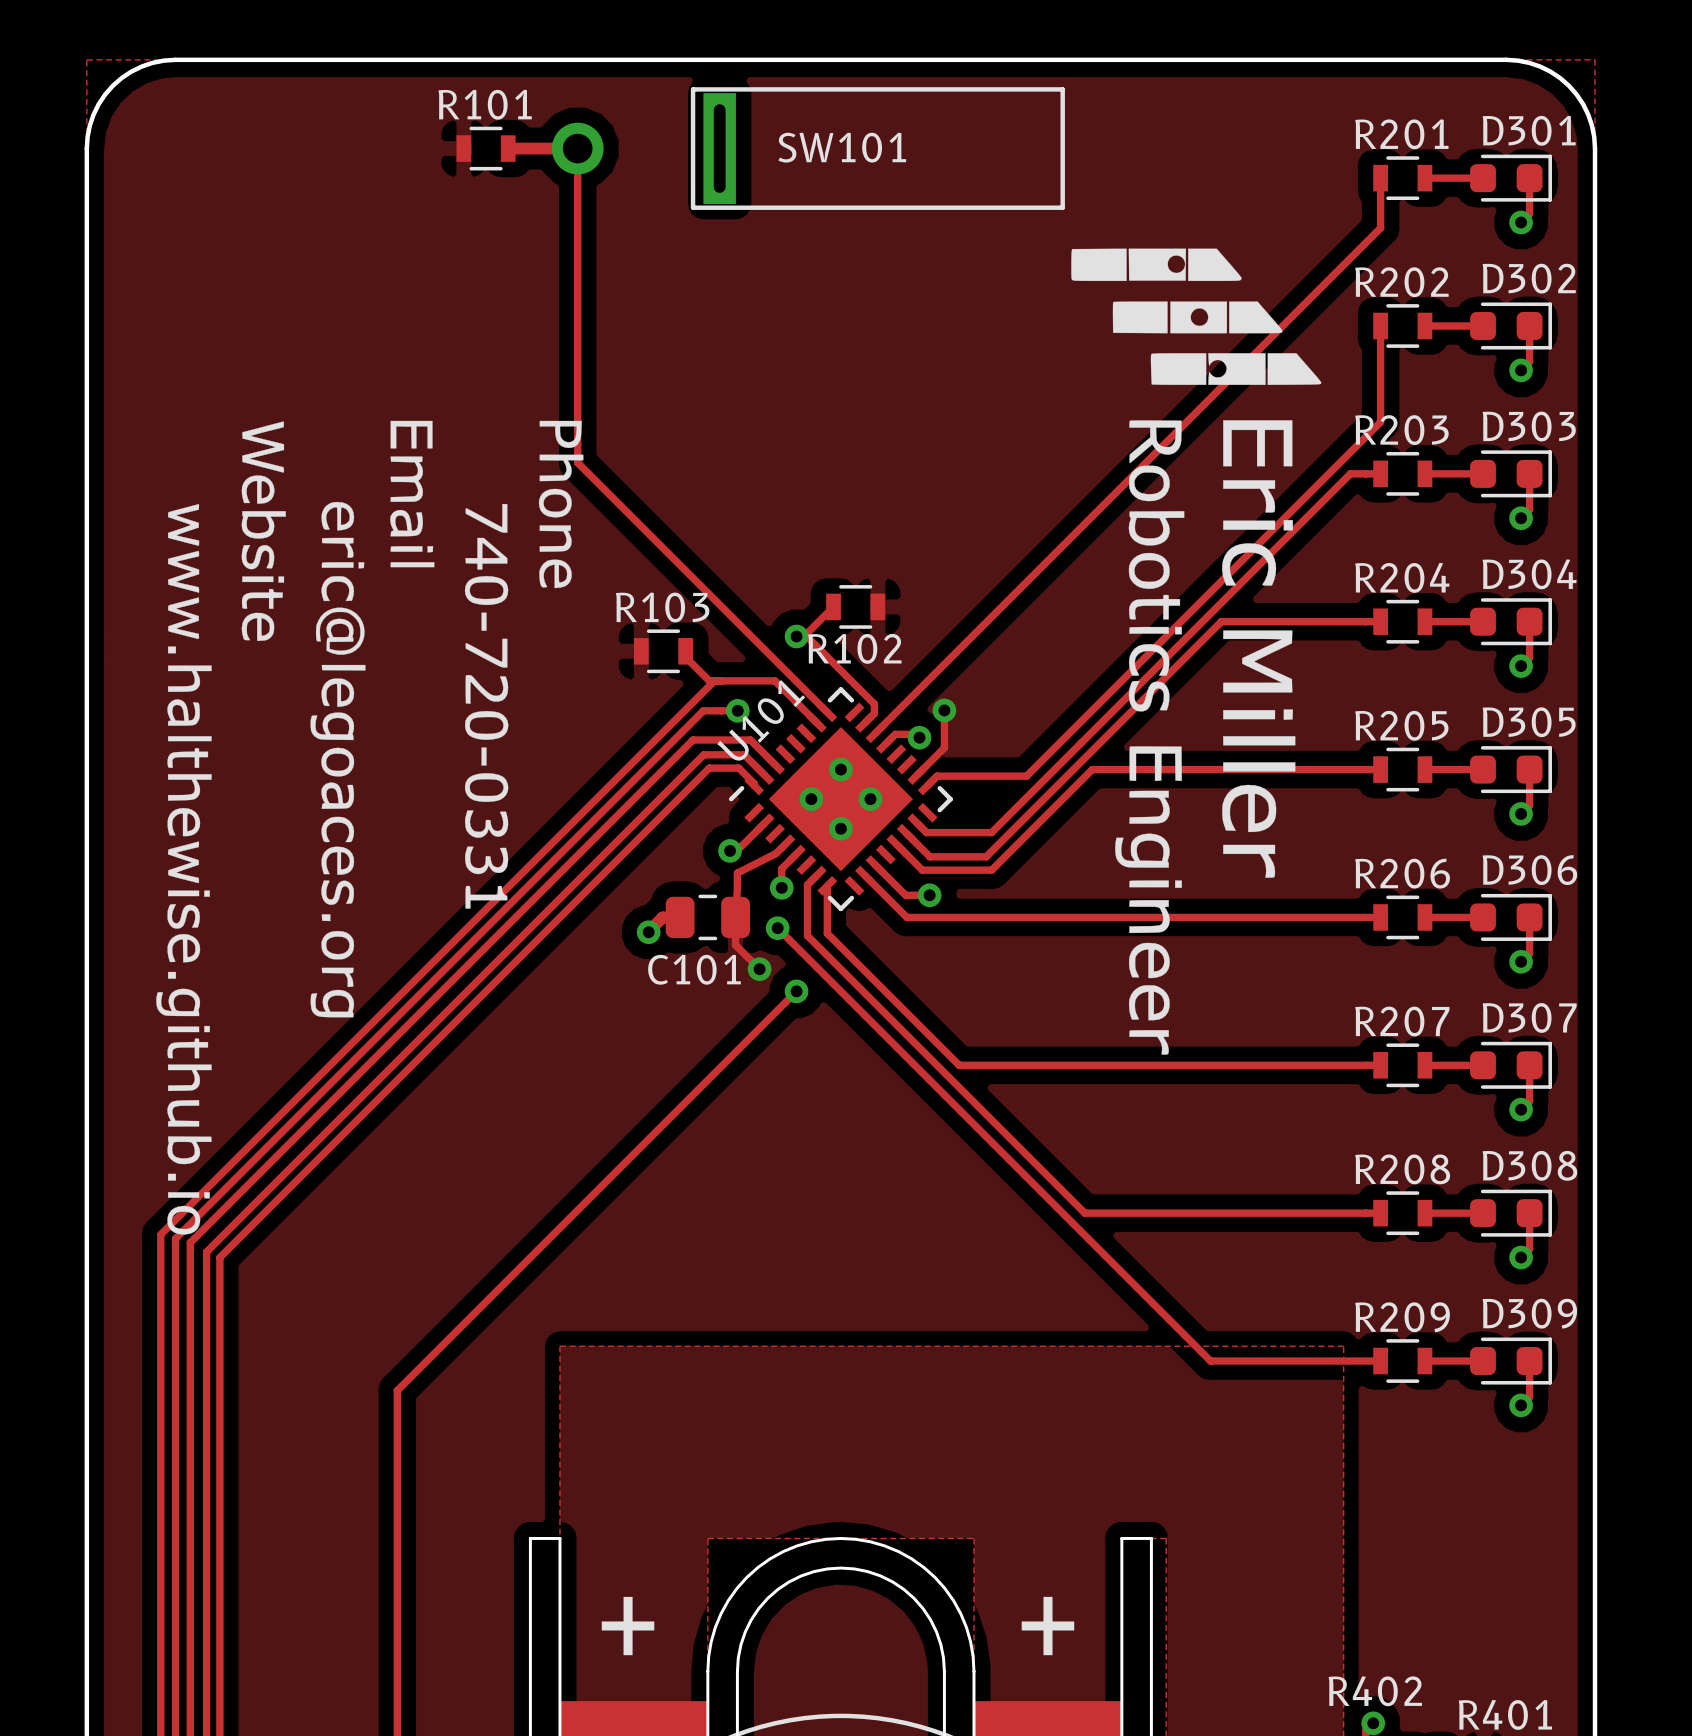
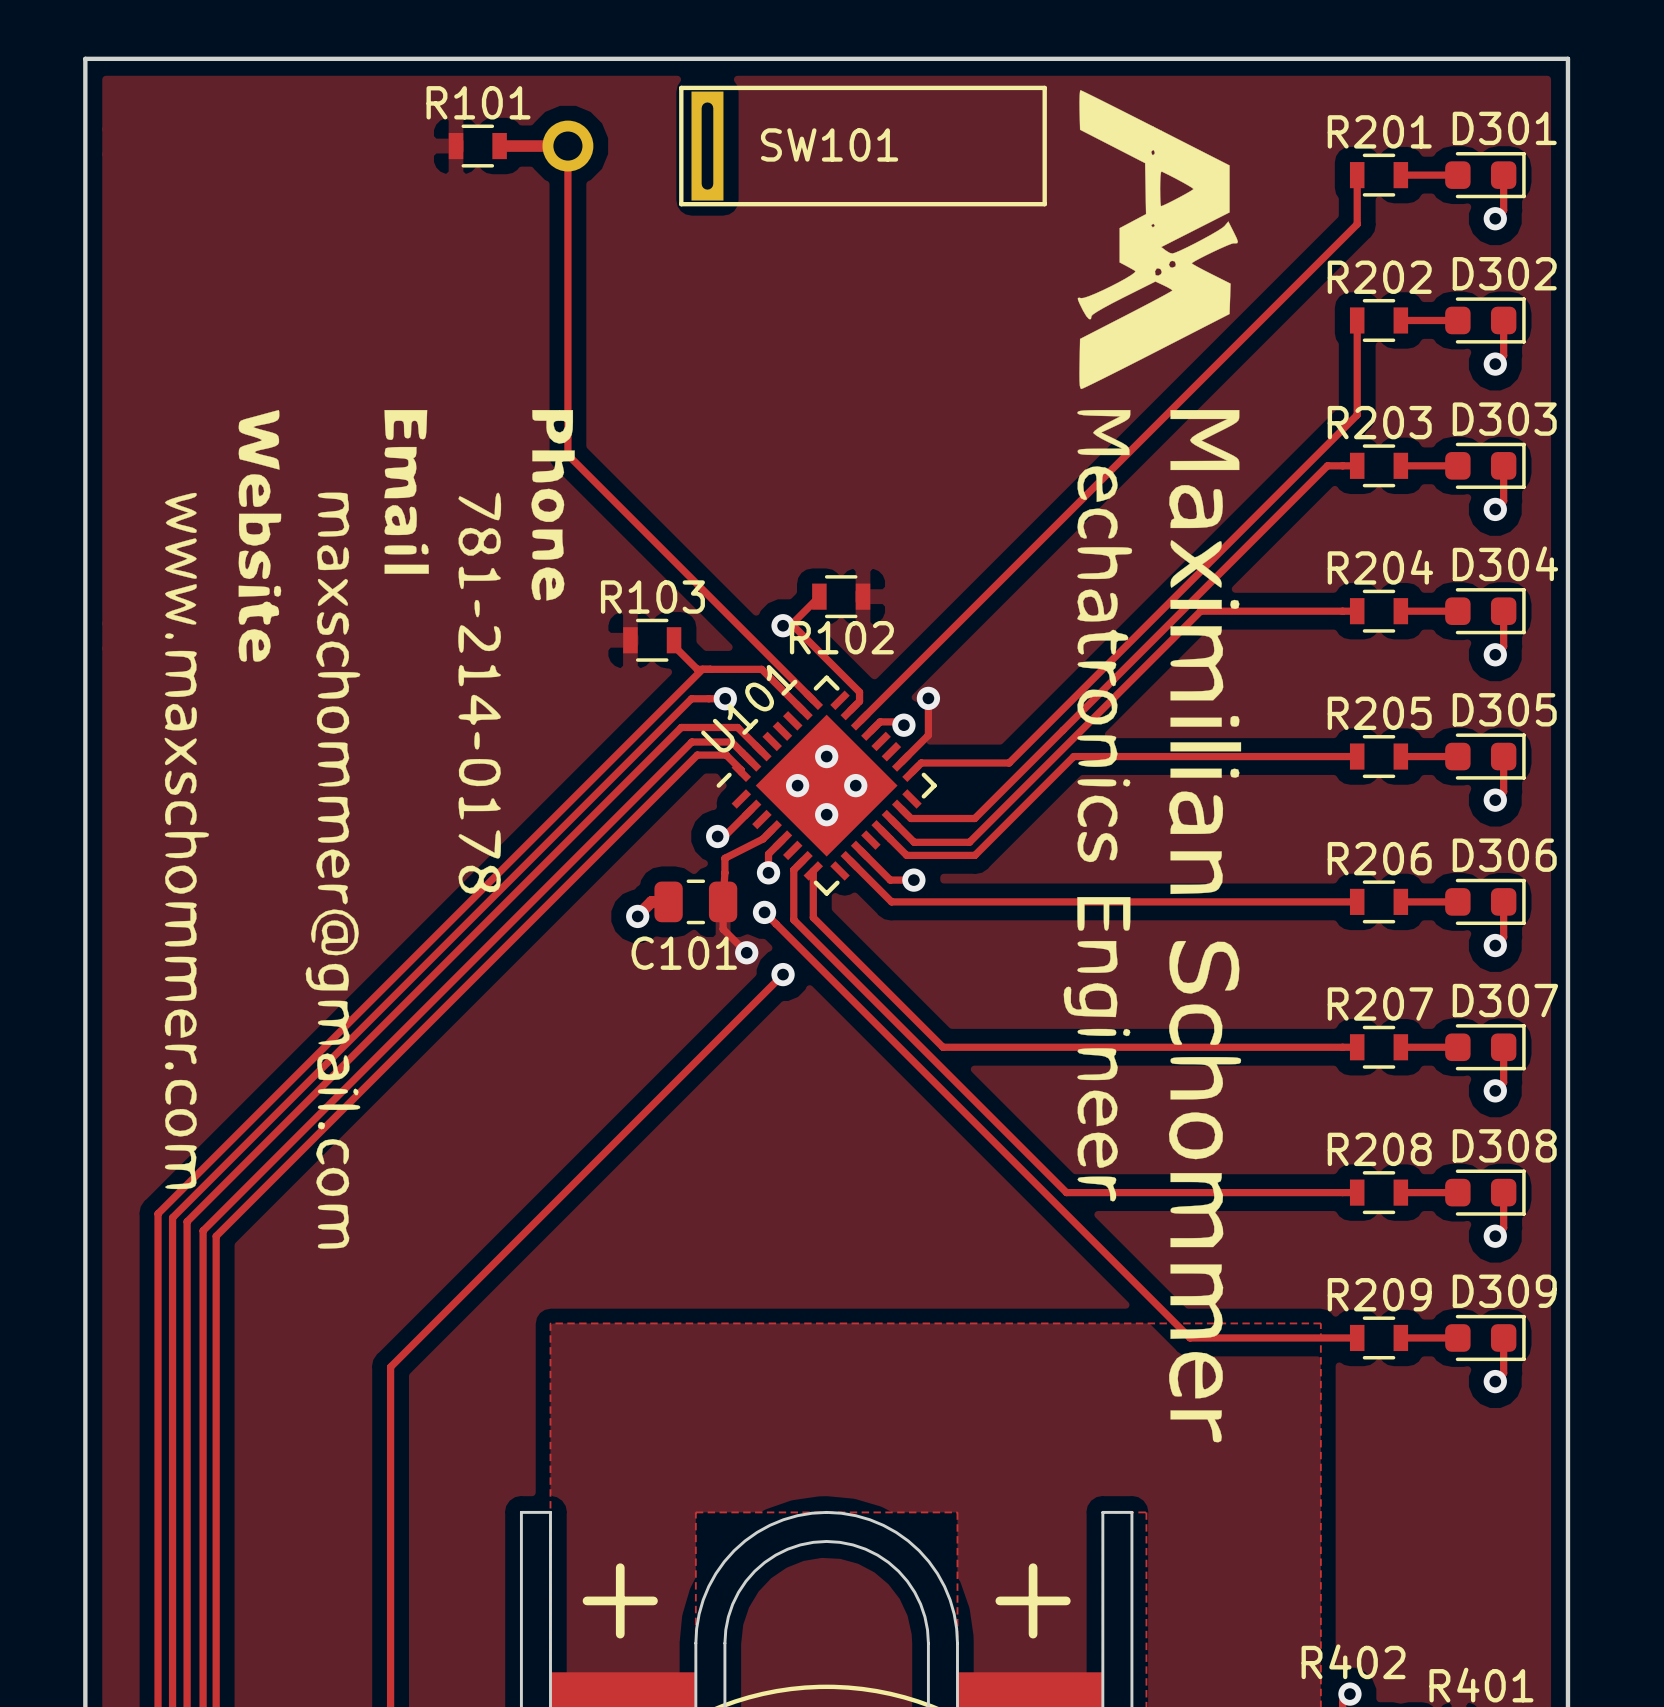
board edge: (175, 59) (152, 62) (141, 66) (121, 78) (112, 85) (105, 94) (93, 114) (87, 136) (86, 148) -> (172, 58) (85, 58) (85, 146)
board edge: (1506, 59) (1529, 62) (1540, 66) (1560, 78) (1569, 85) (1576, 94) (1588, 114) (1594, 136) (1595, 148) -> (1480, 58) (1567, 58) (1567, 146)
drawing: none -> [164, 90, 1242, 1443]
drawing: [156, 248, 1322, 1235] -> none

